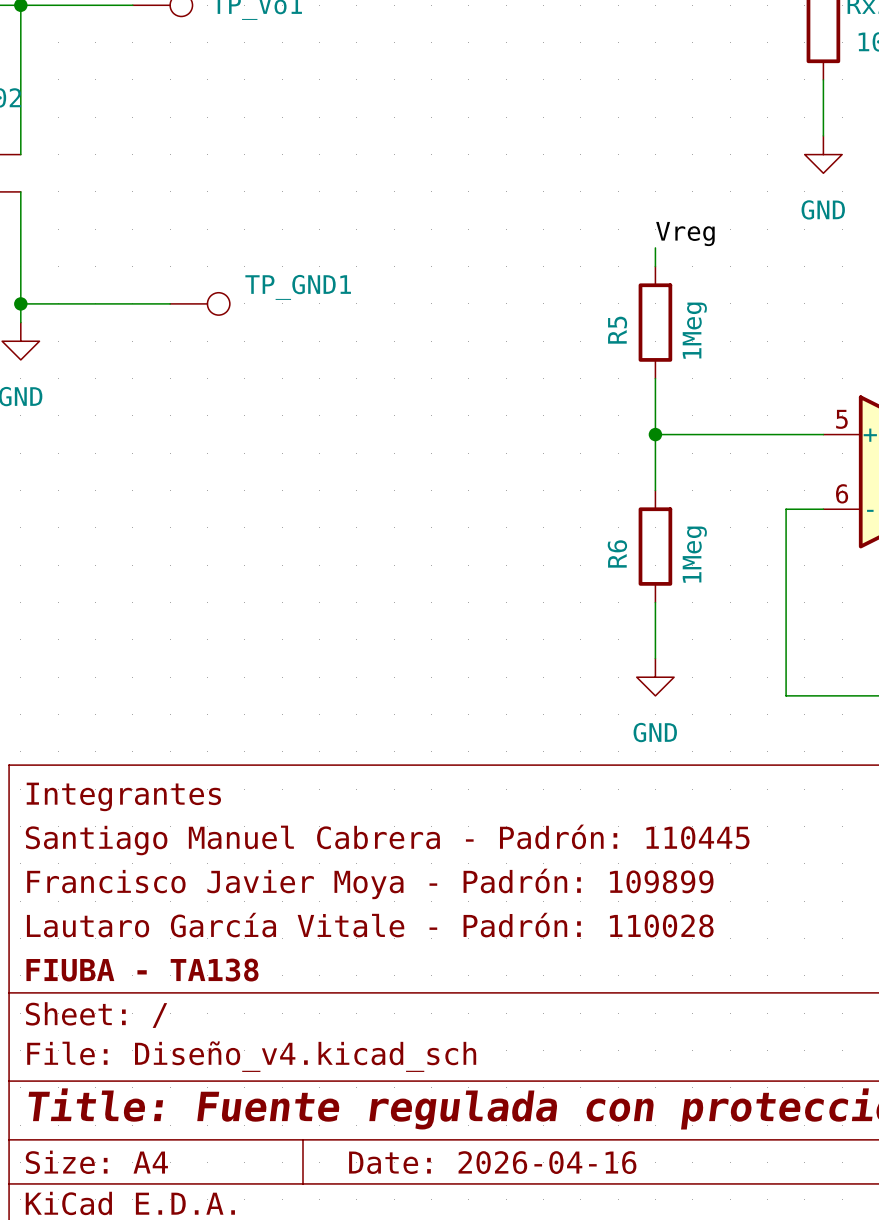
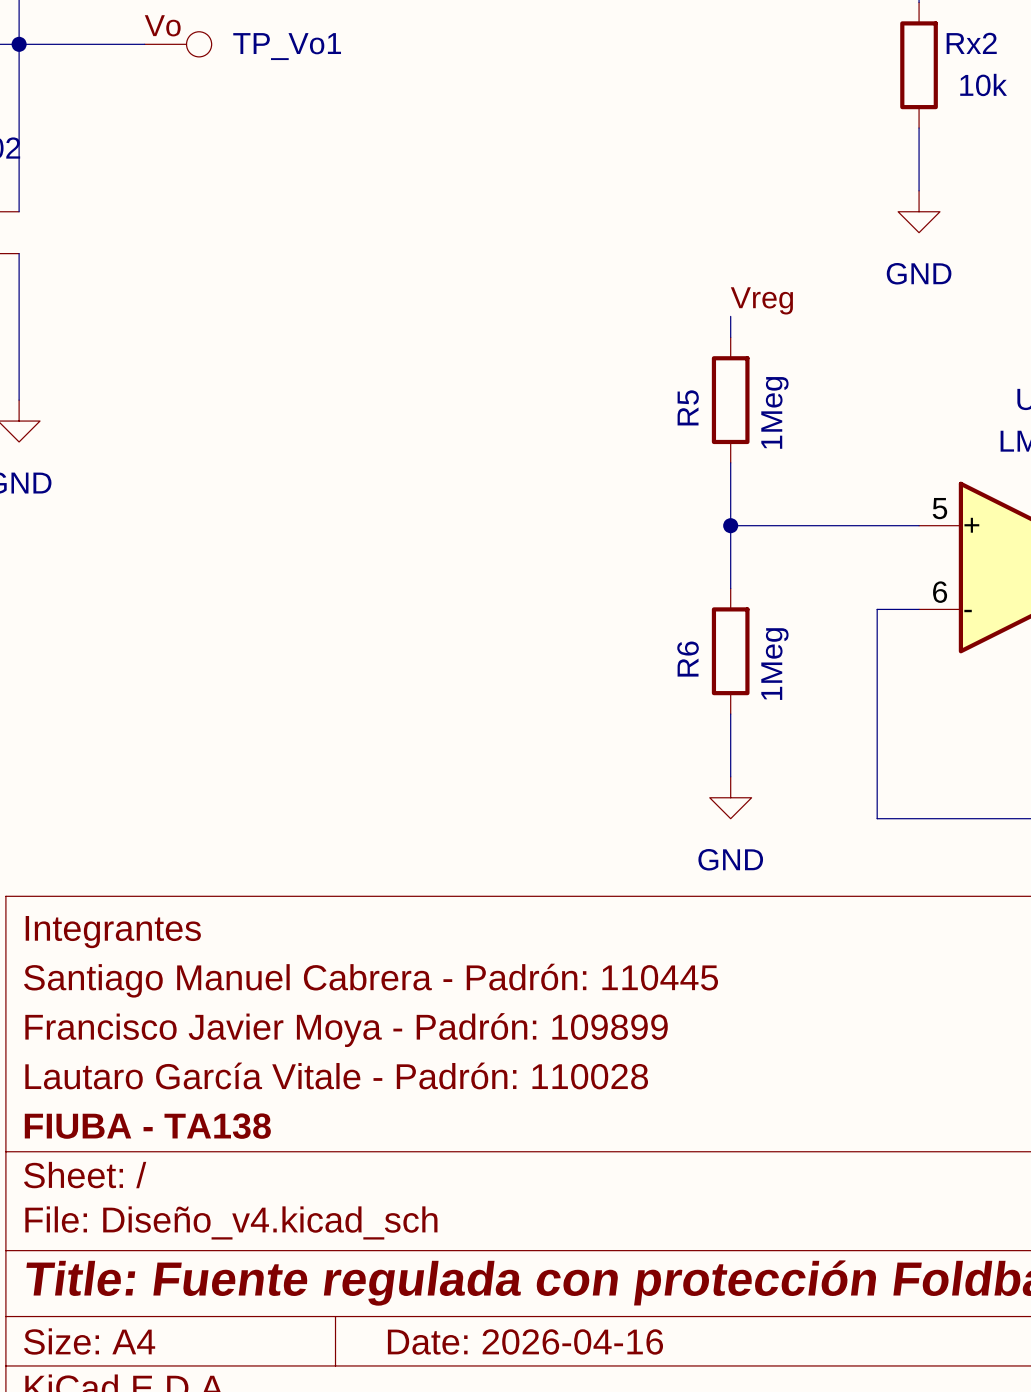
wire: (20, 303) (170, 303) -> none
junction: (20, 303) -> none
TP_GND1: (199, 303) -> none

